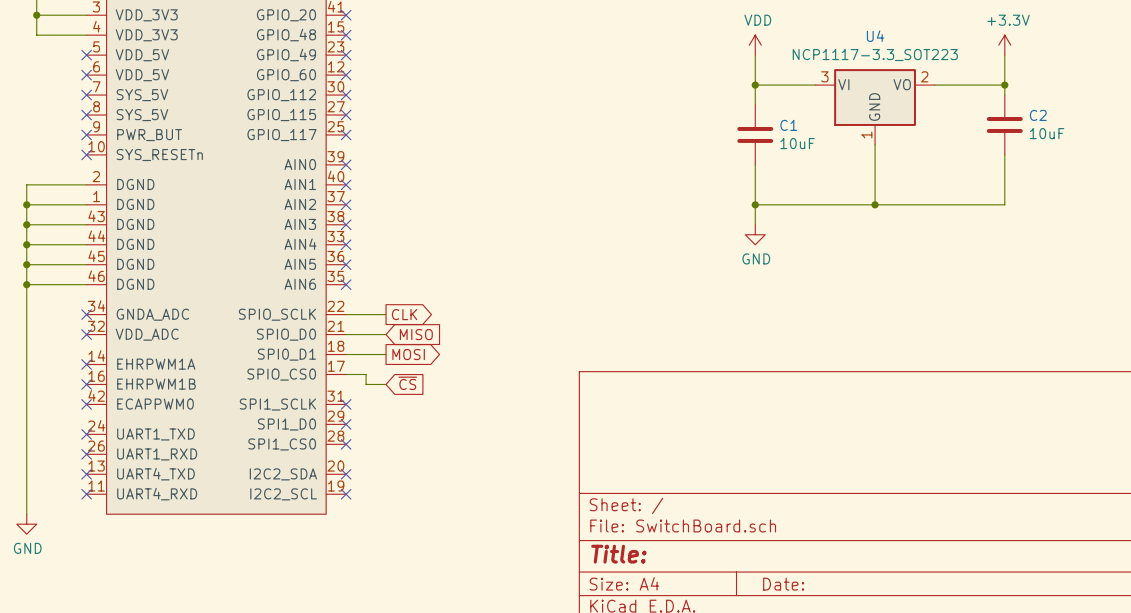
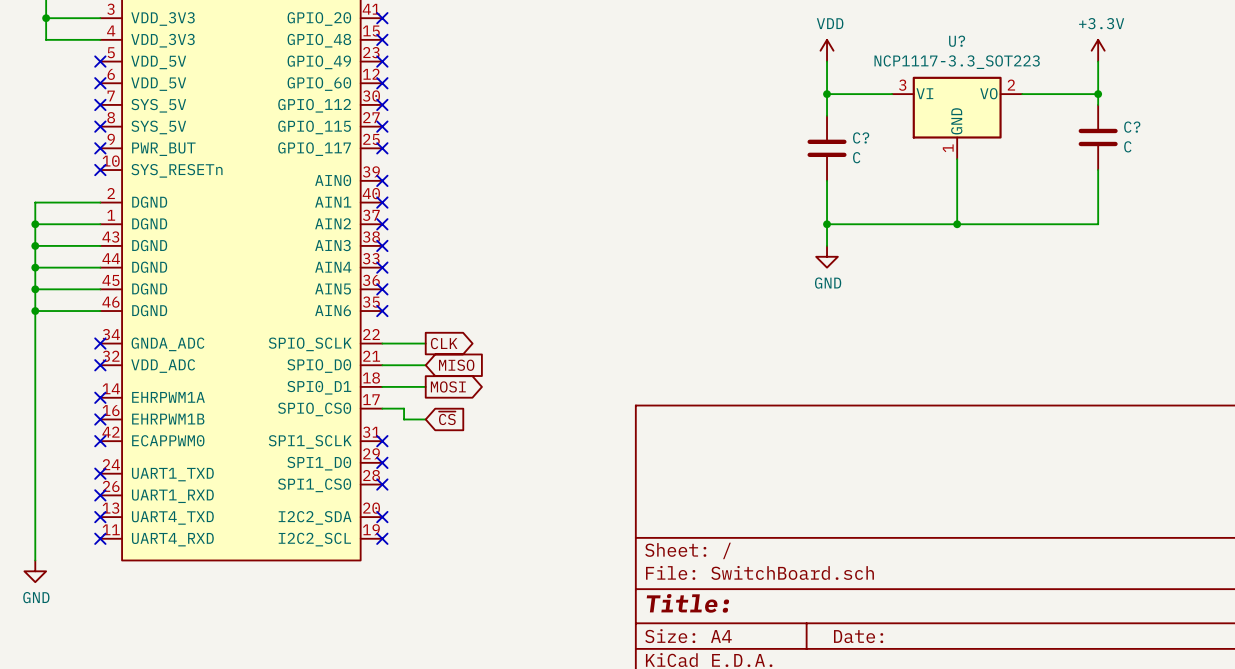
U4 name: U4 (875, 36) -> U? (957, 41)
C2 name: C2 (1038, 115) -> C? (1132, 127)
C1 name: C1 (788, 125) -> C? (861, 137)
C2 value: 10uF (1047, 133) -> C (1127, 146)
C1 value: 10uF (797, 143) -> C (856, 157)

